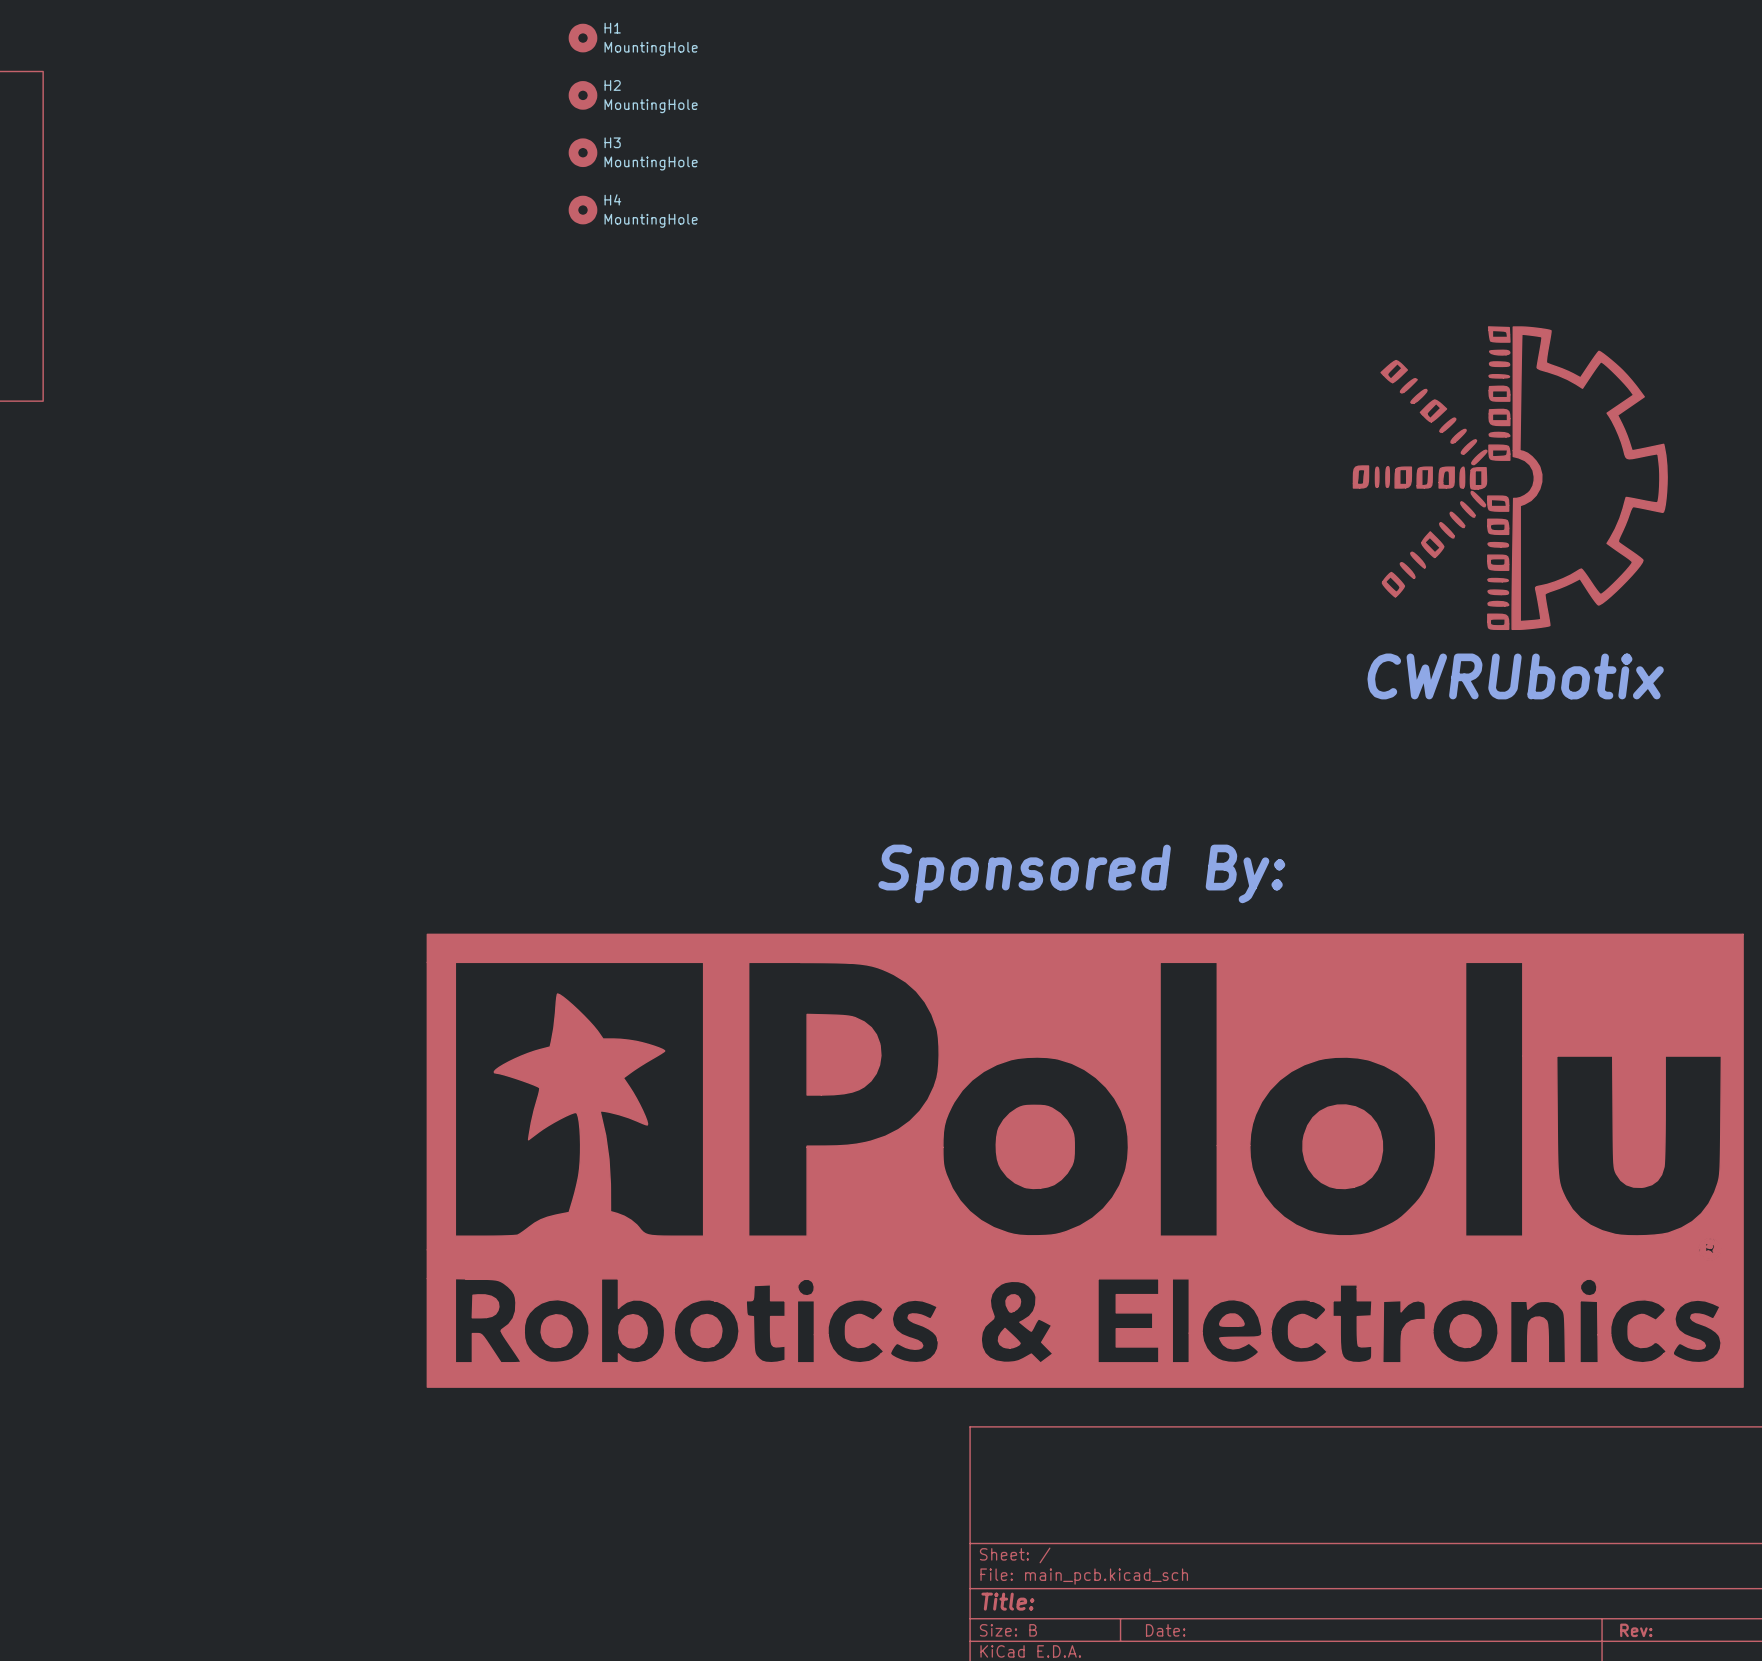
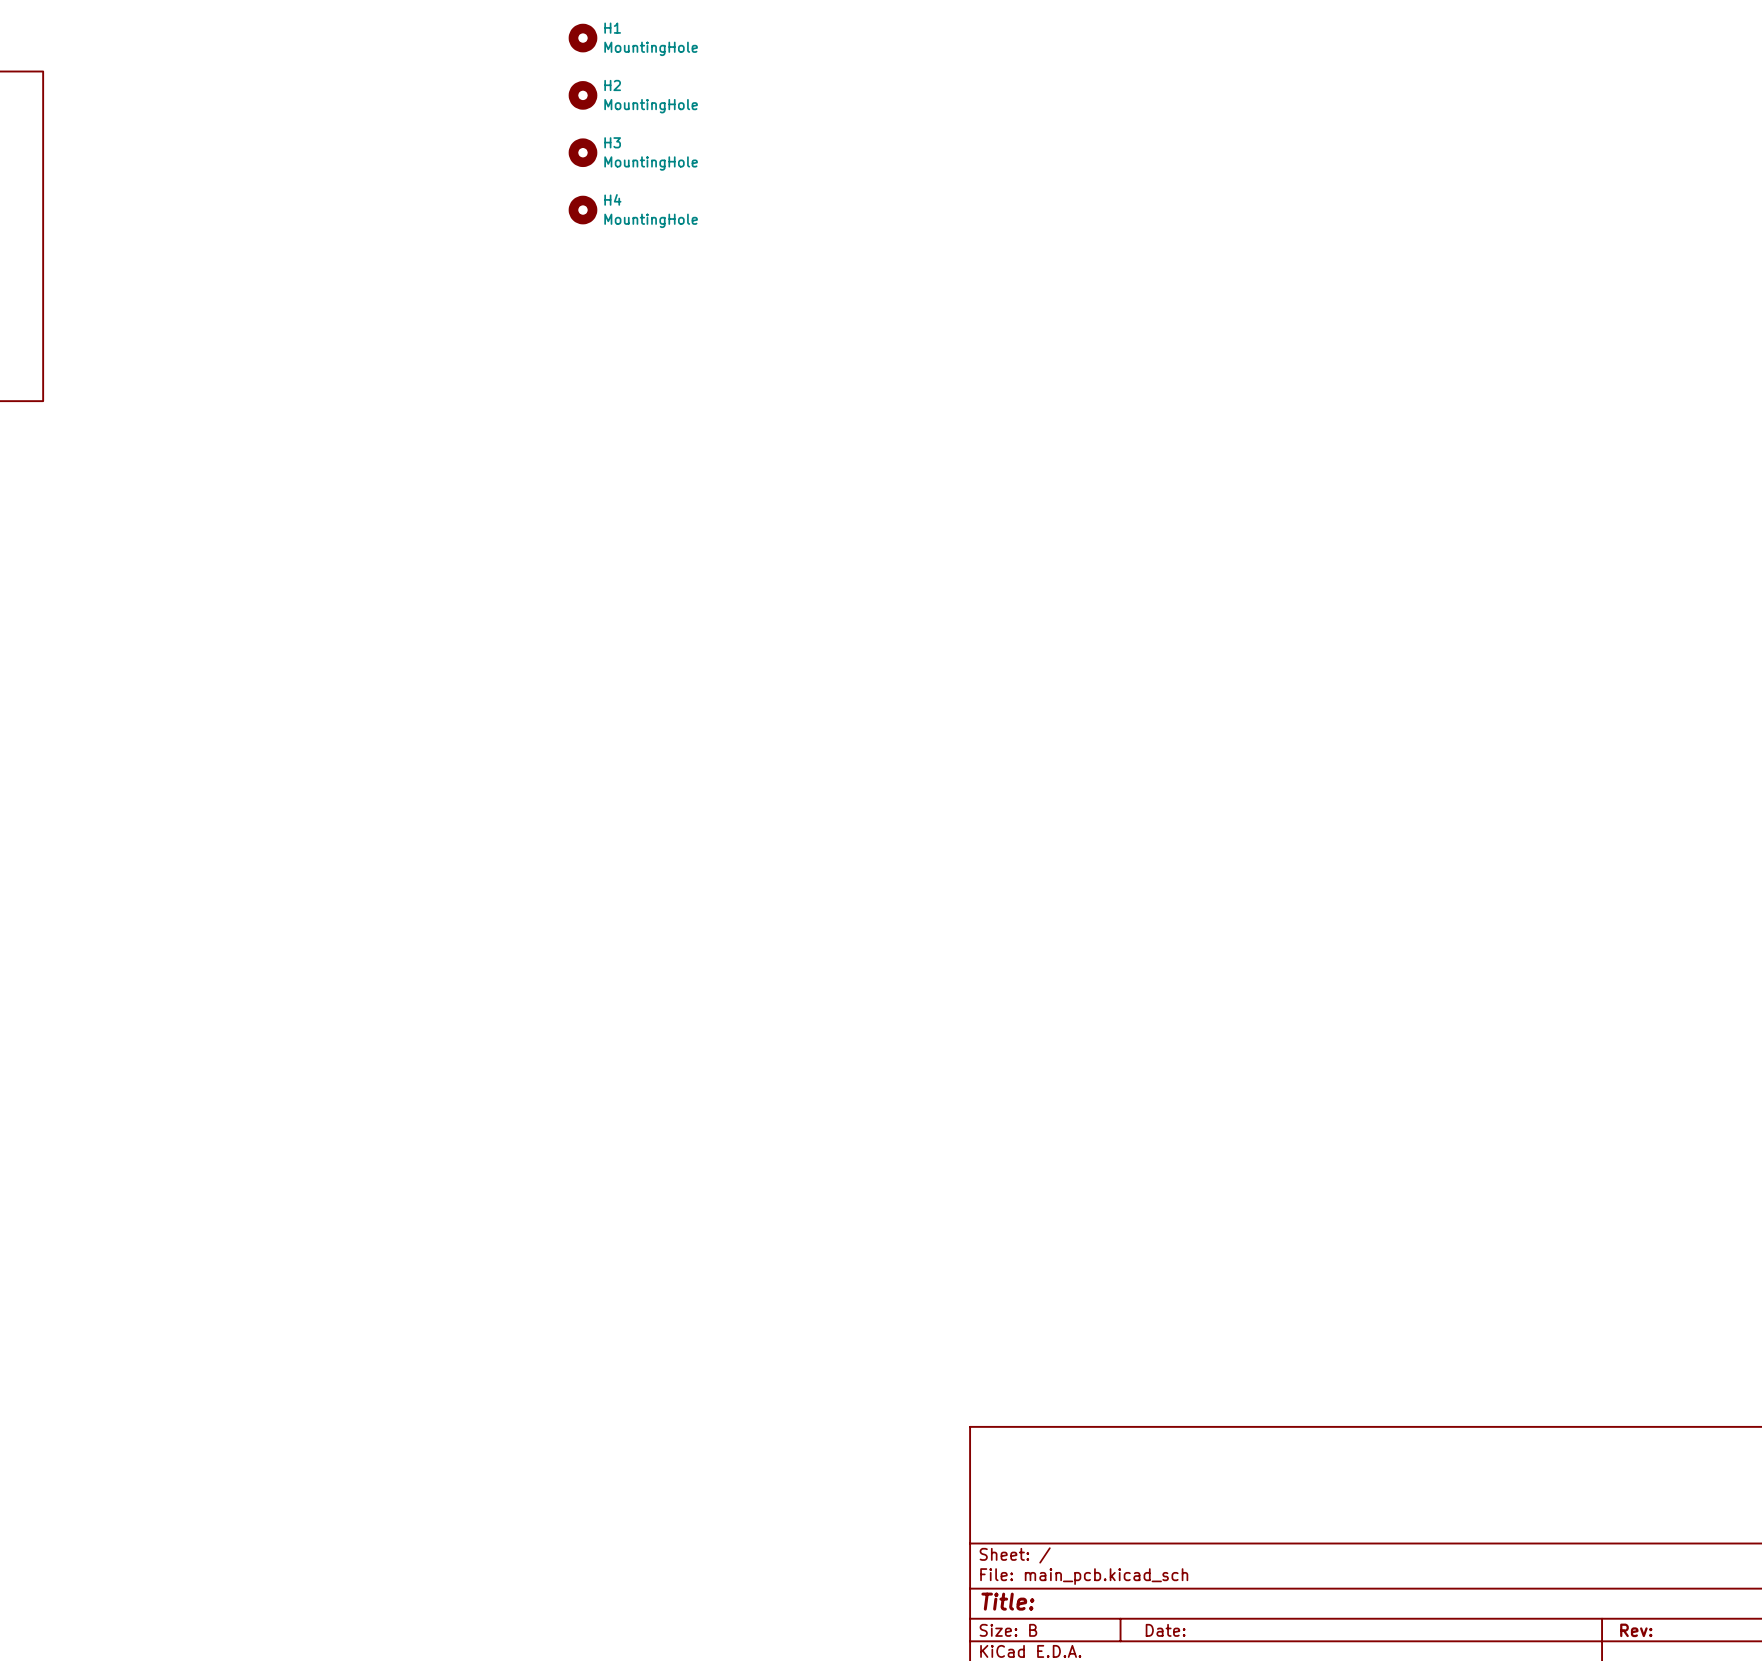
power symbol: (1510, 478) -> none
text: CWRUbotix (1515, 676) -> none
text: Sponsored By: (1081, 873) -> none
power symbol: (1085, 1160) -> none

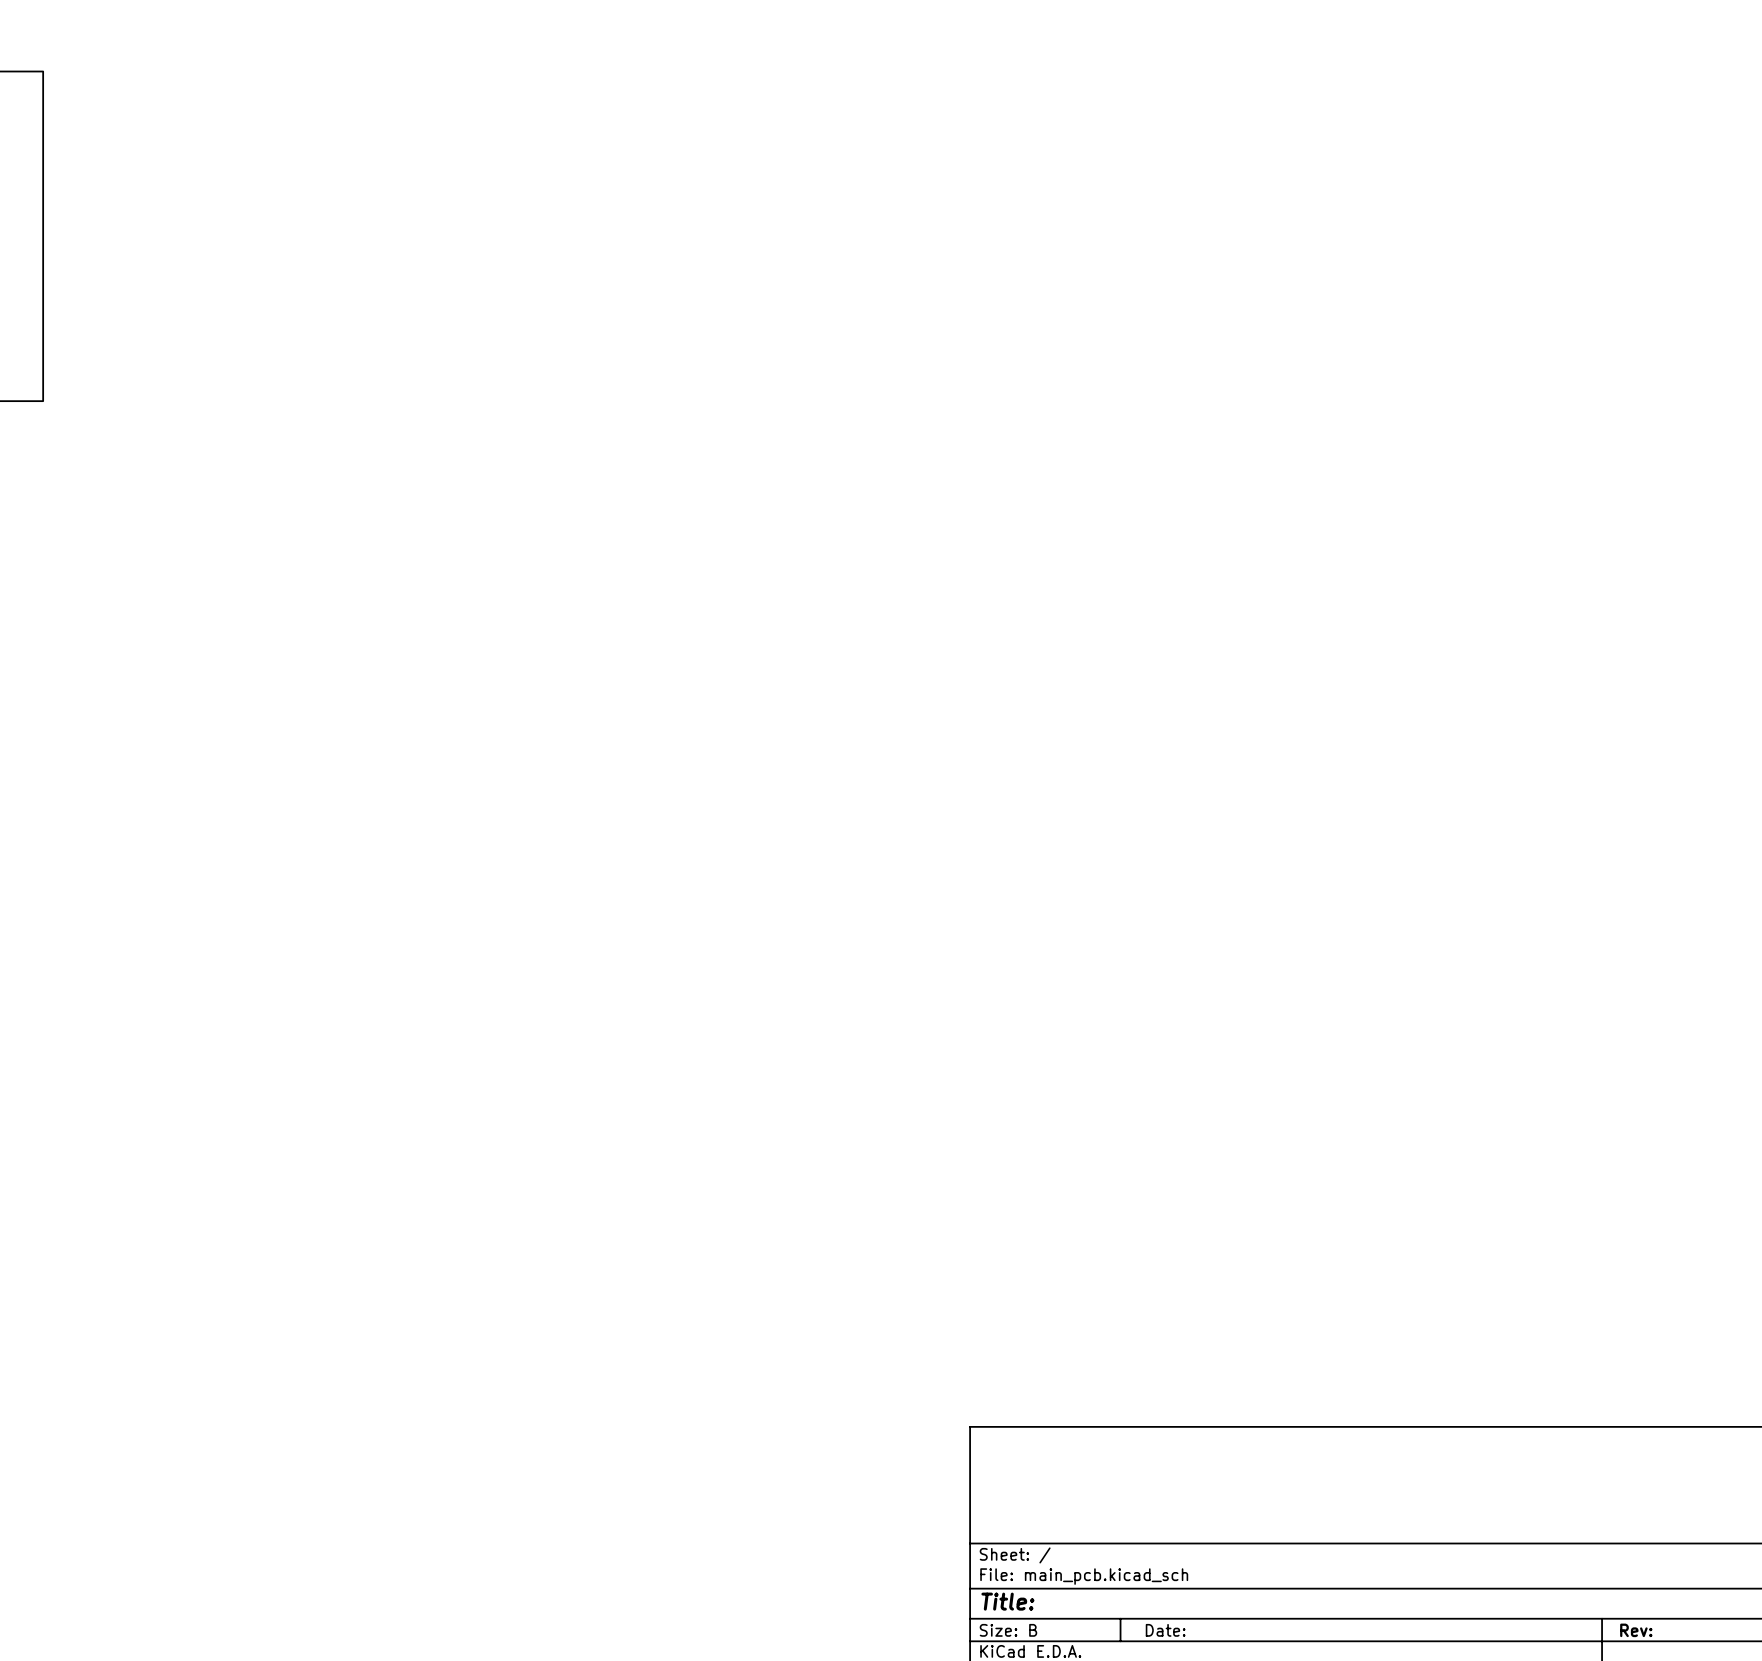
H1: MountingHole (582, 38) -> none
H2: MountingHole (582, 95) -> none
H3: MountingHole (582, 152) -> none
H4: MountingHole (582, 210) -> none

